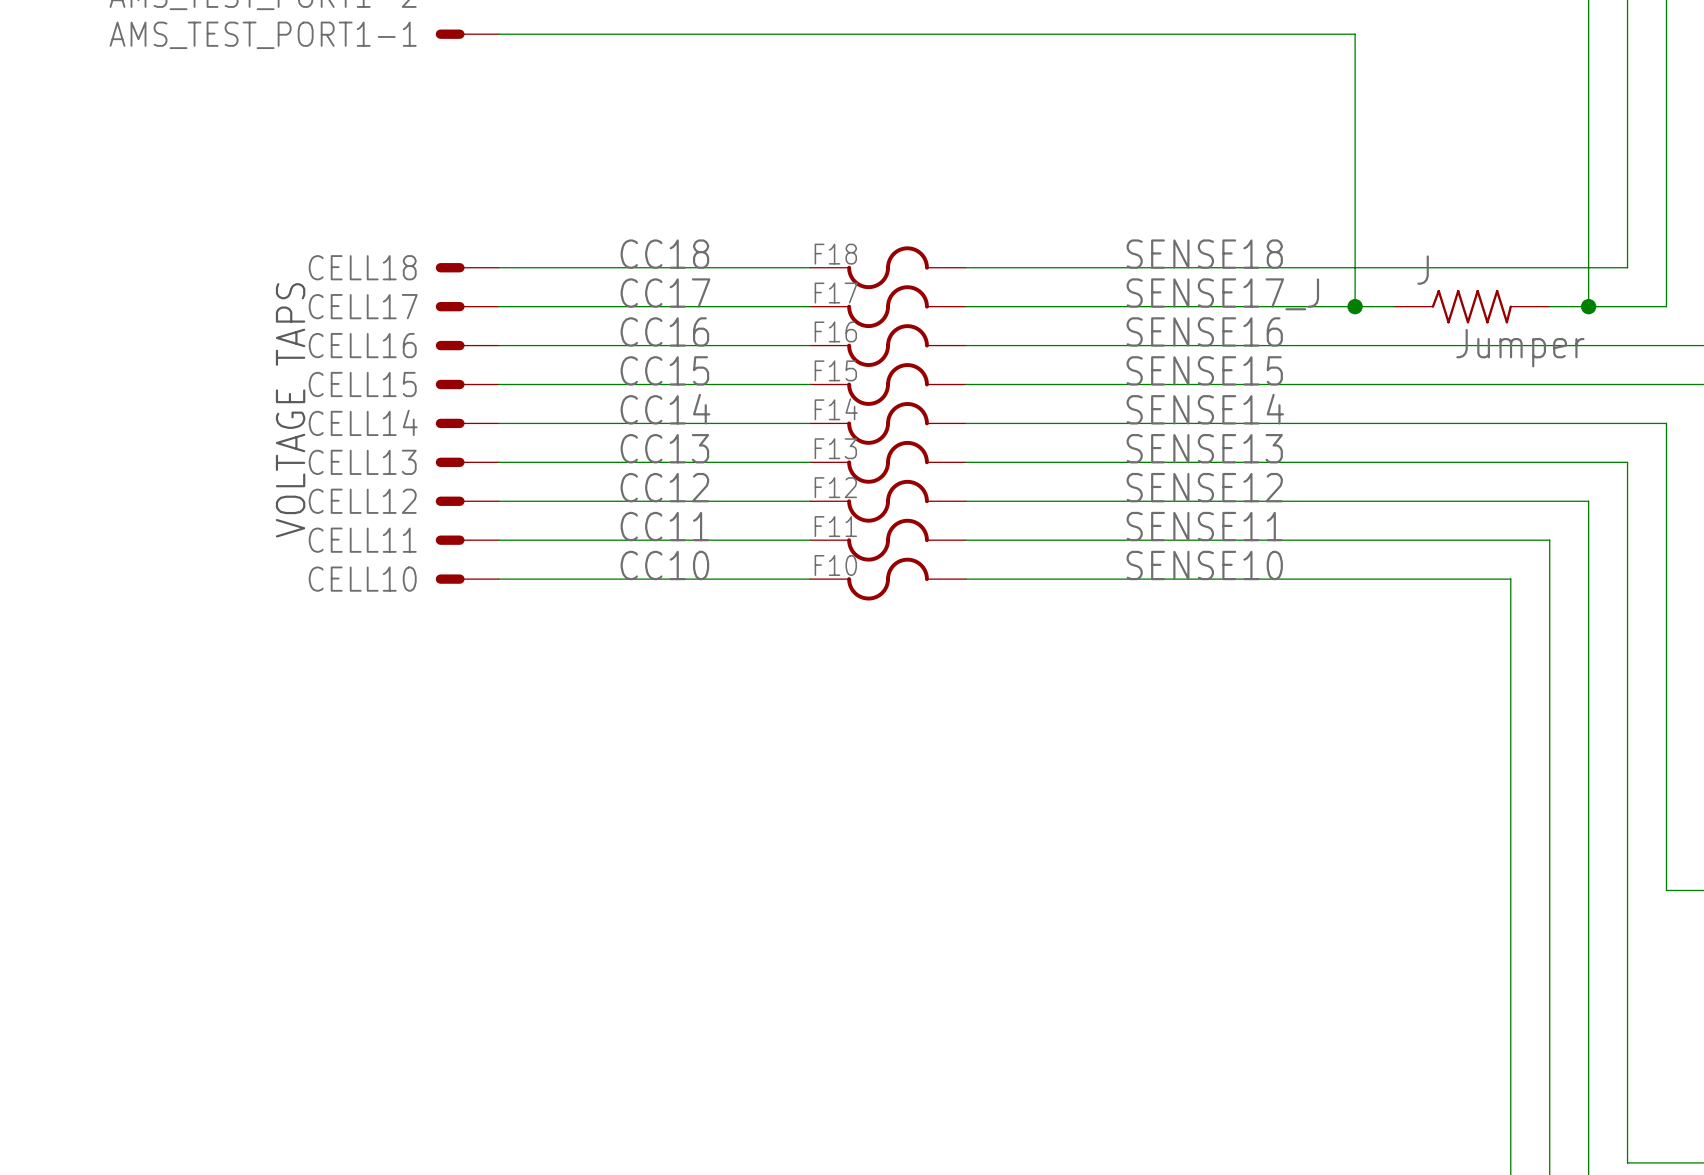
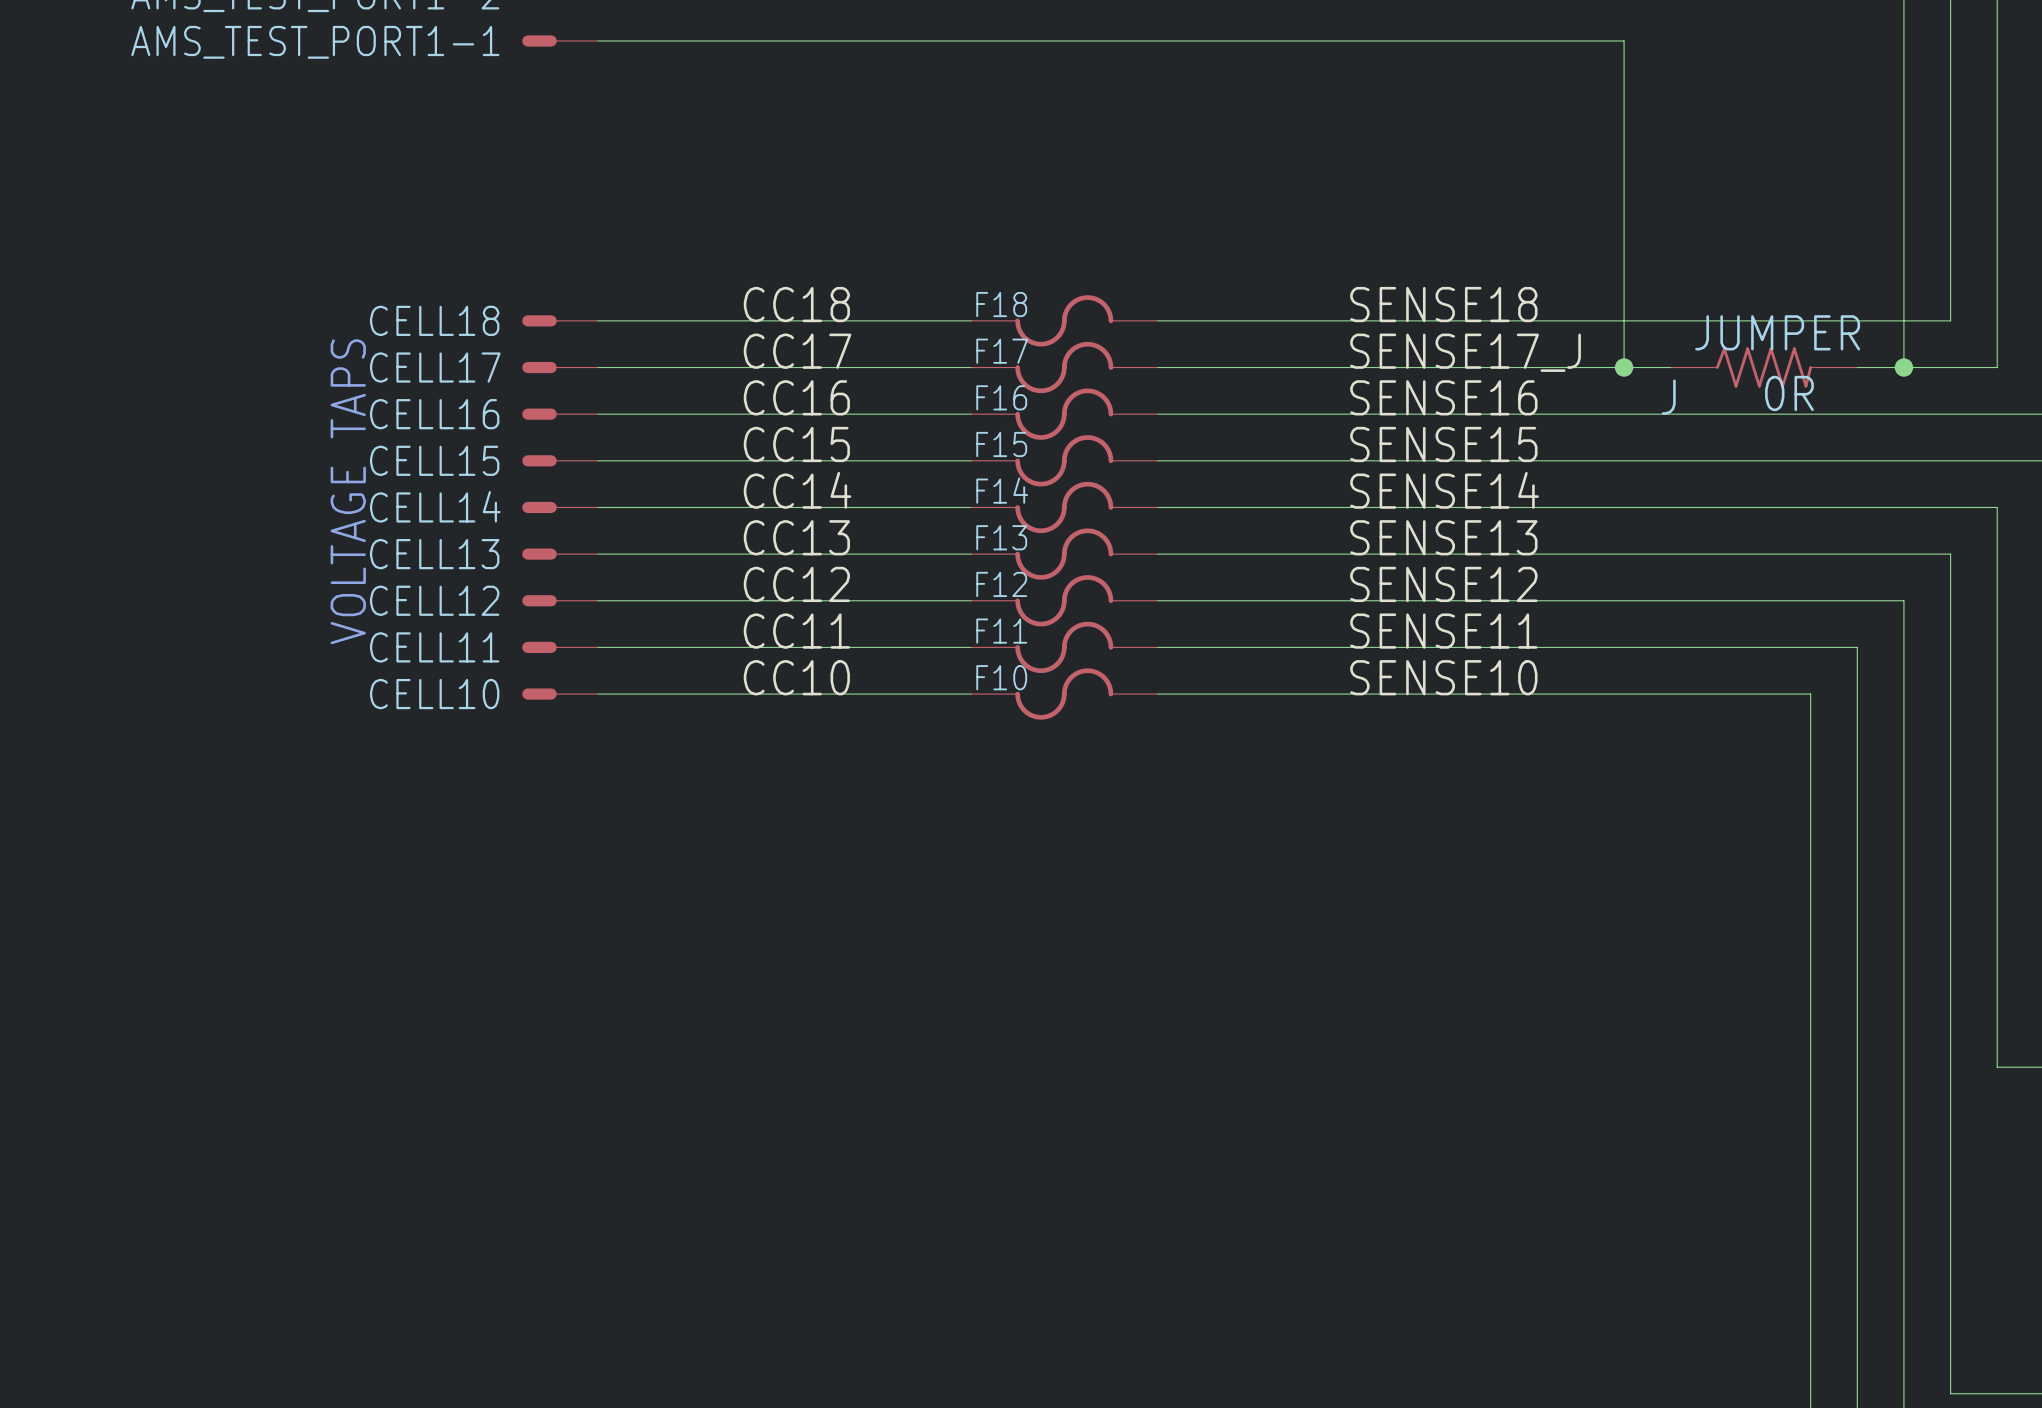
J name position: J (1423, 270) -> J (1668, 397)
J text: none -> JUMPER (1777, 332)
J value: Jumper (1520, 348) -> 0R (1789, 393)

